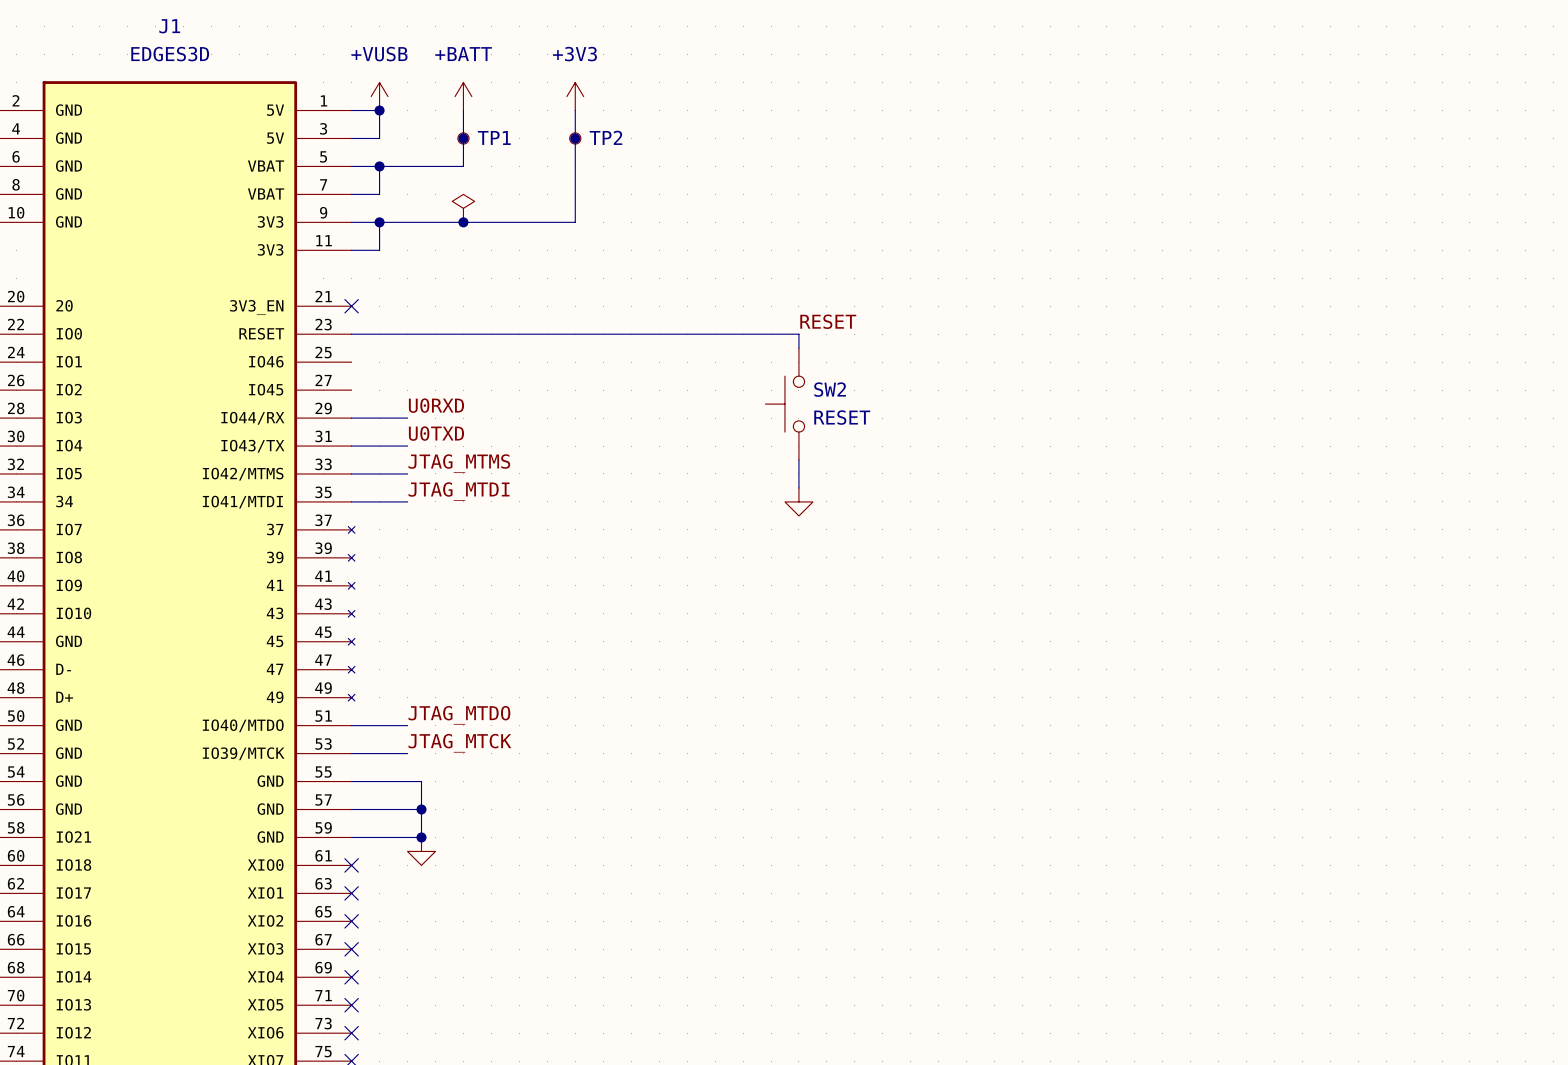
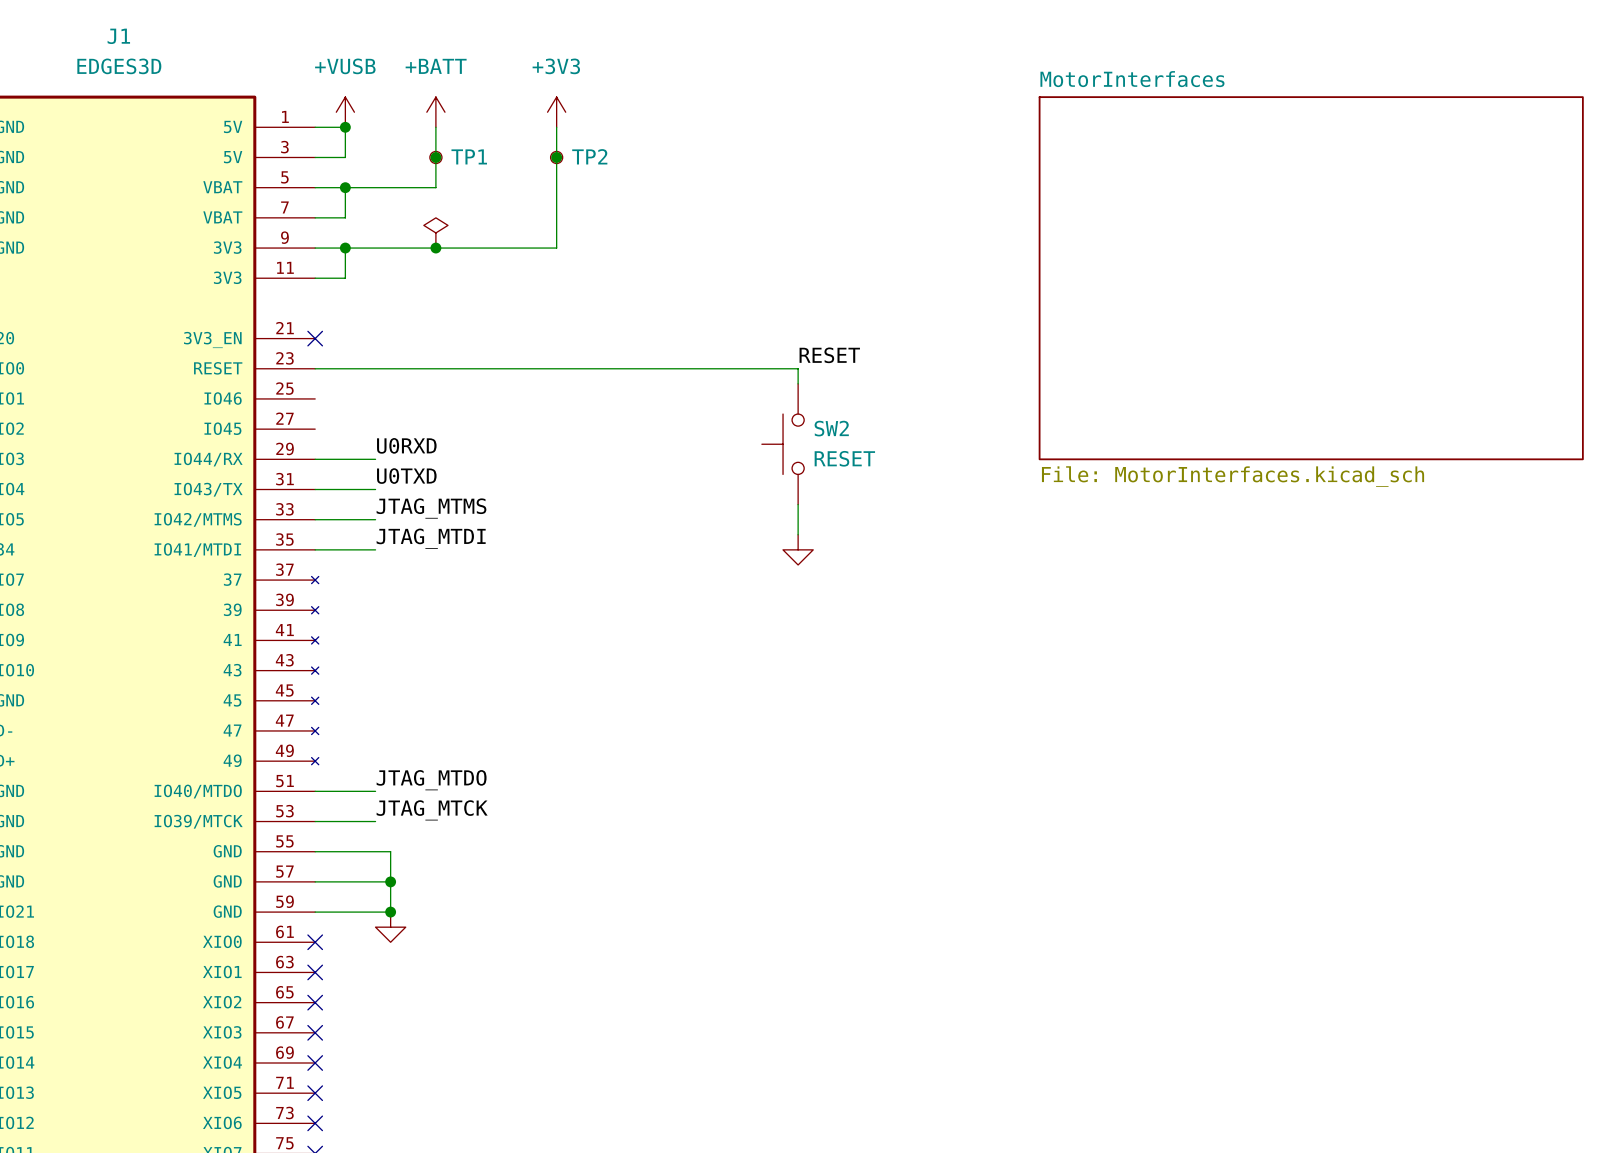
sheet MotorInterfaces: none -> File: MotorInterfaces.kicad_sch (1311, 278)

